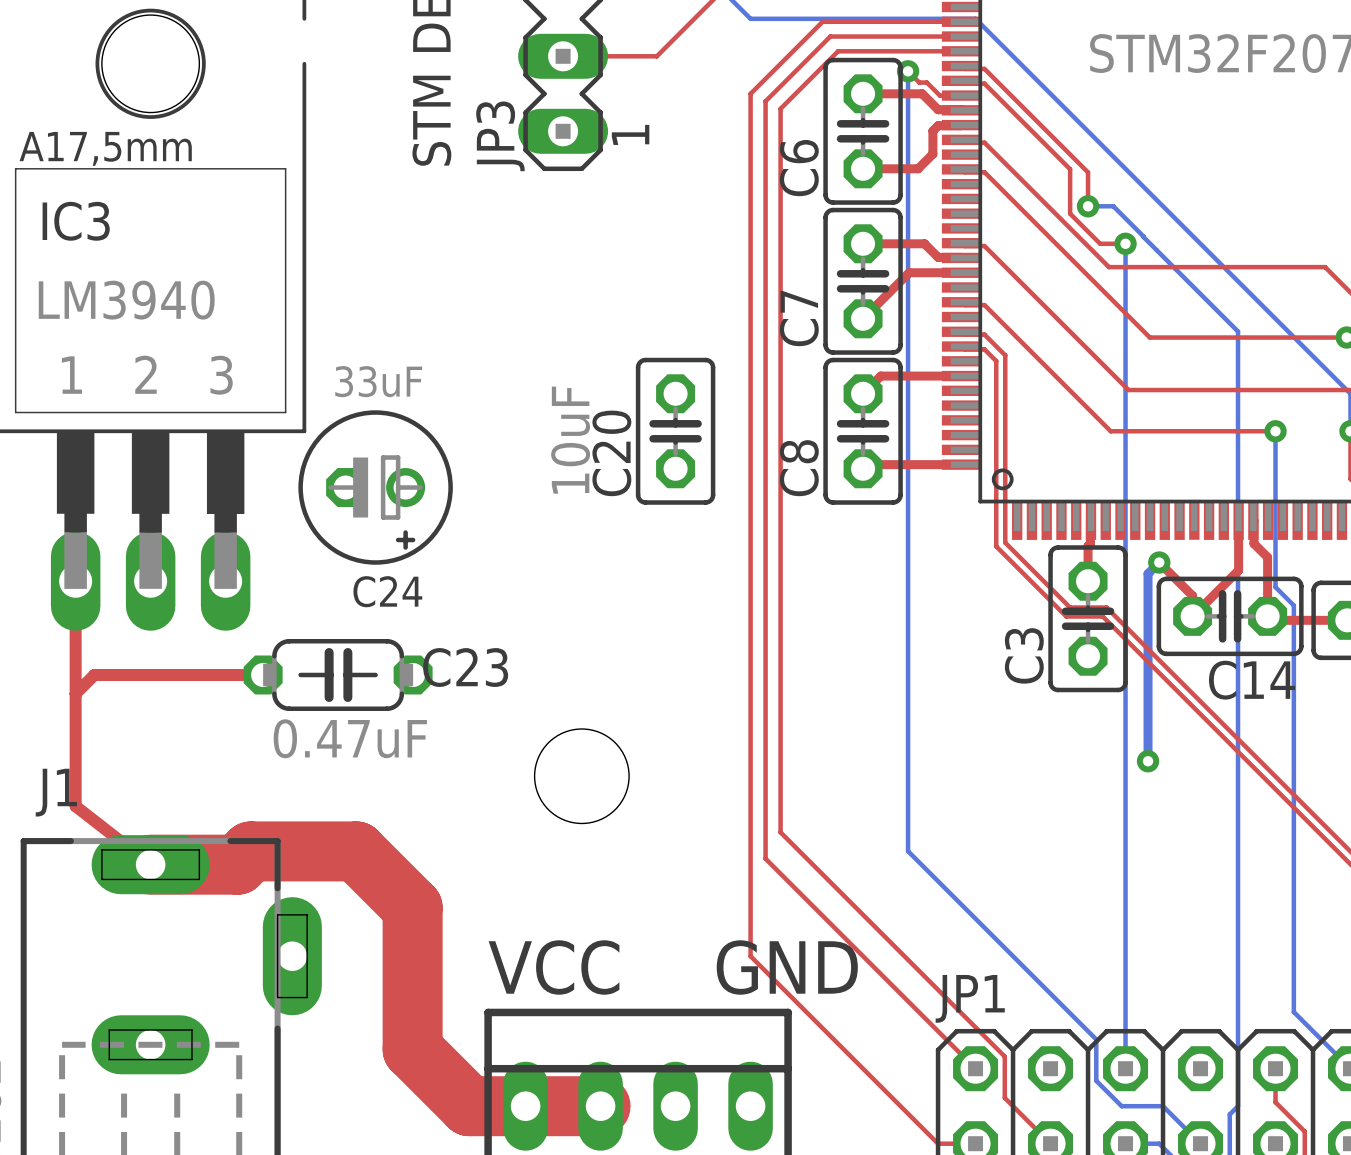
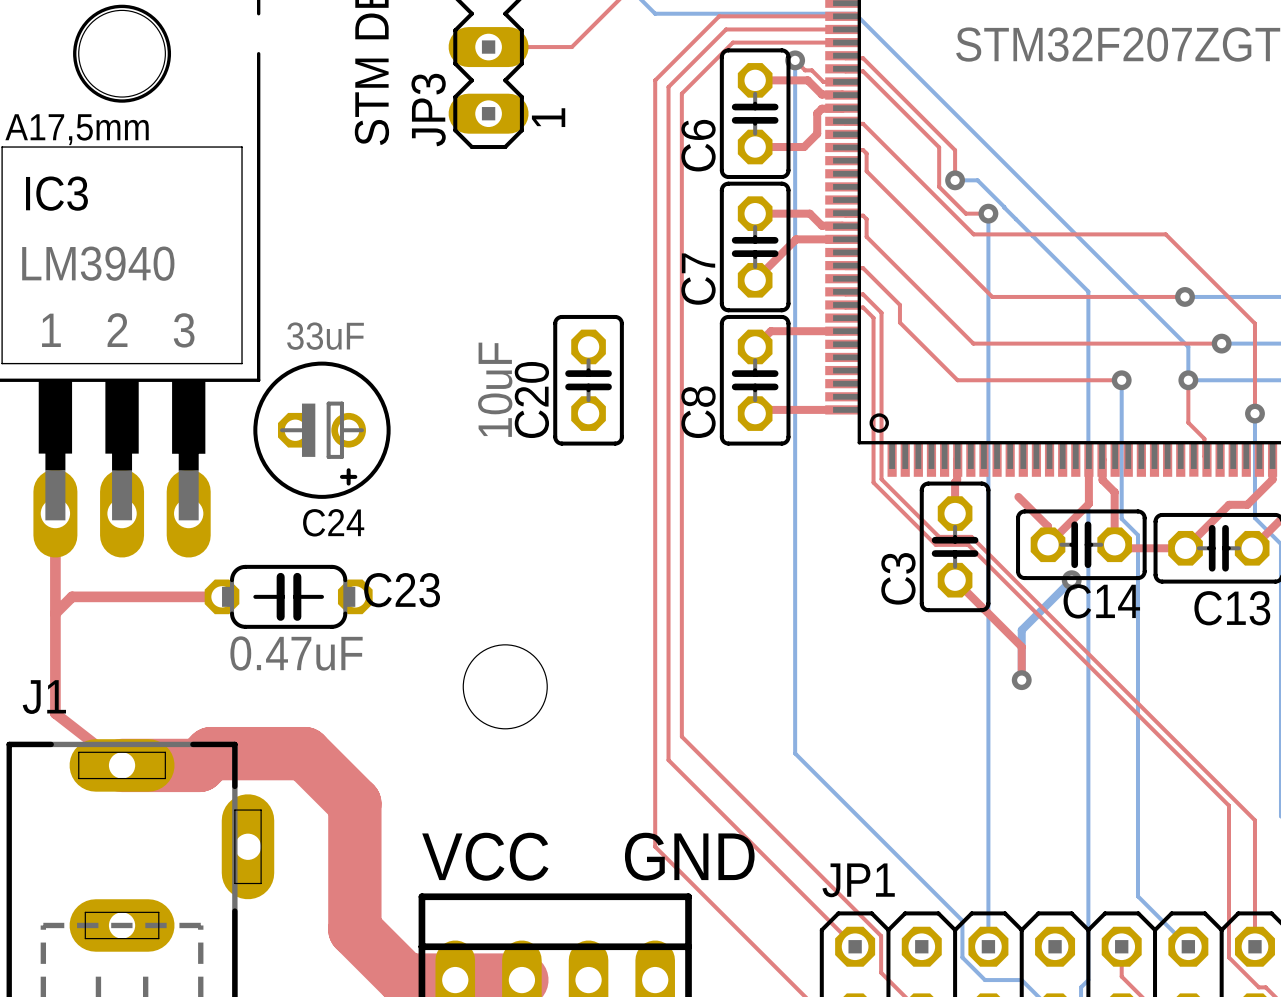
top track: (988, 176) (1149, 337) -> (866, 153) (866, 171) (992, 296) (1010, 296)
top track: (988, 250) (1128, 390) -> (866, 219) (866, 236) (973, 343) (991, 343)
top track: (1025, 346) (1110, 431) -> (899, 304) (899, 322) (957, 380) (975, 380)
bottom track: (1159, 562) (1148, 573) (1148, 761) -> none
via: (1159, 562) -> none
top track: none -> (955, 580) (1021, 646) (1021, 680)
bottom track: none -> (1071, 580) (1021, 630) (1021, 680)
via: none -> (1071, 580)
via position: (1148, 761) -> (1021, 680)

